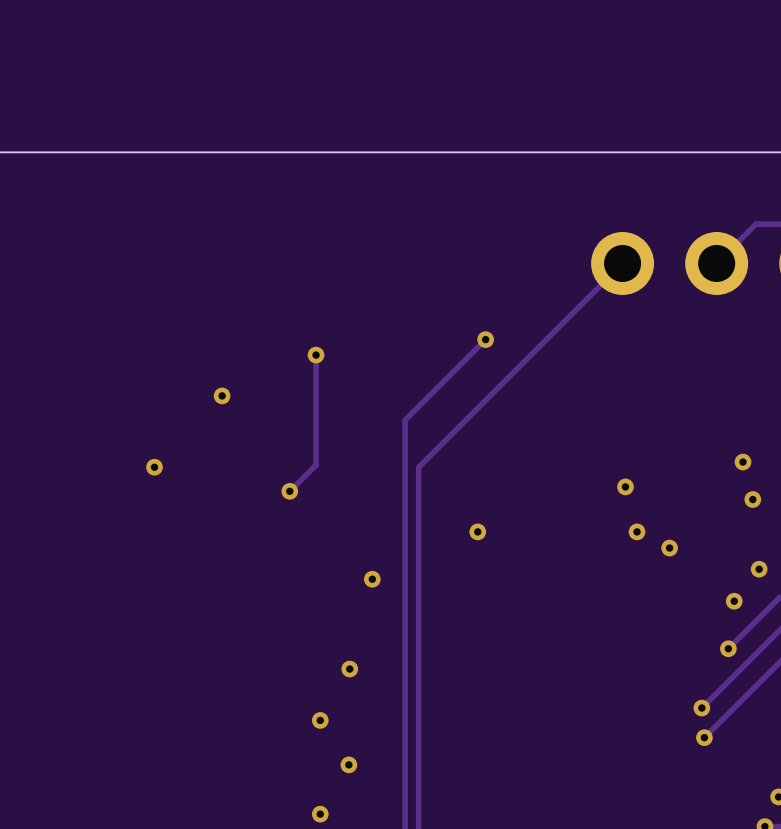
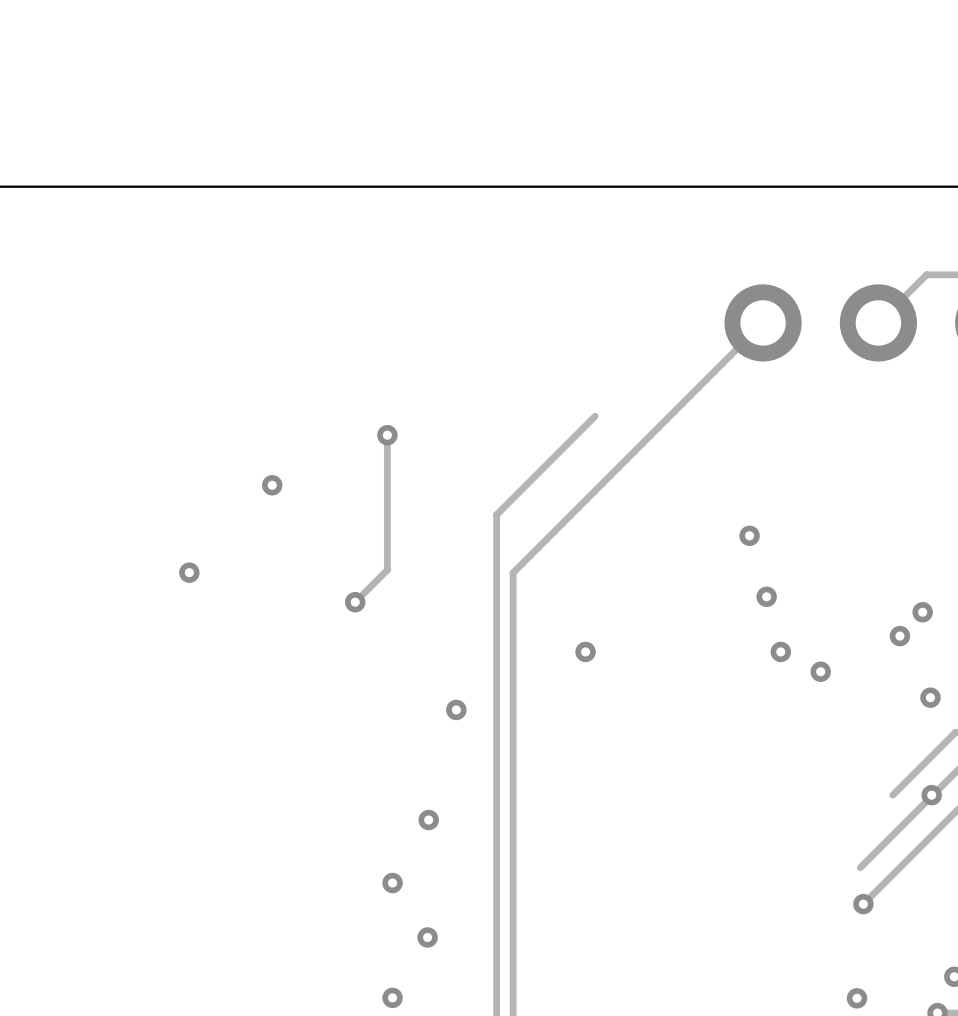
via: (485, 339) -> none
via: none -> (749, 535)
via: (743, 462) -> none
via: none -> (899, 636)
via: (734, 601) -> none
via: (728, 648) -> none
via: none -> (931, 795)
via: (701, 708) -> none
via: none -> (857, 998)

